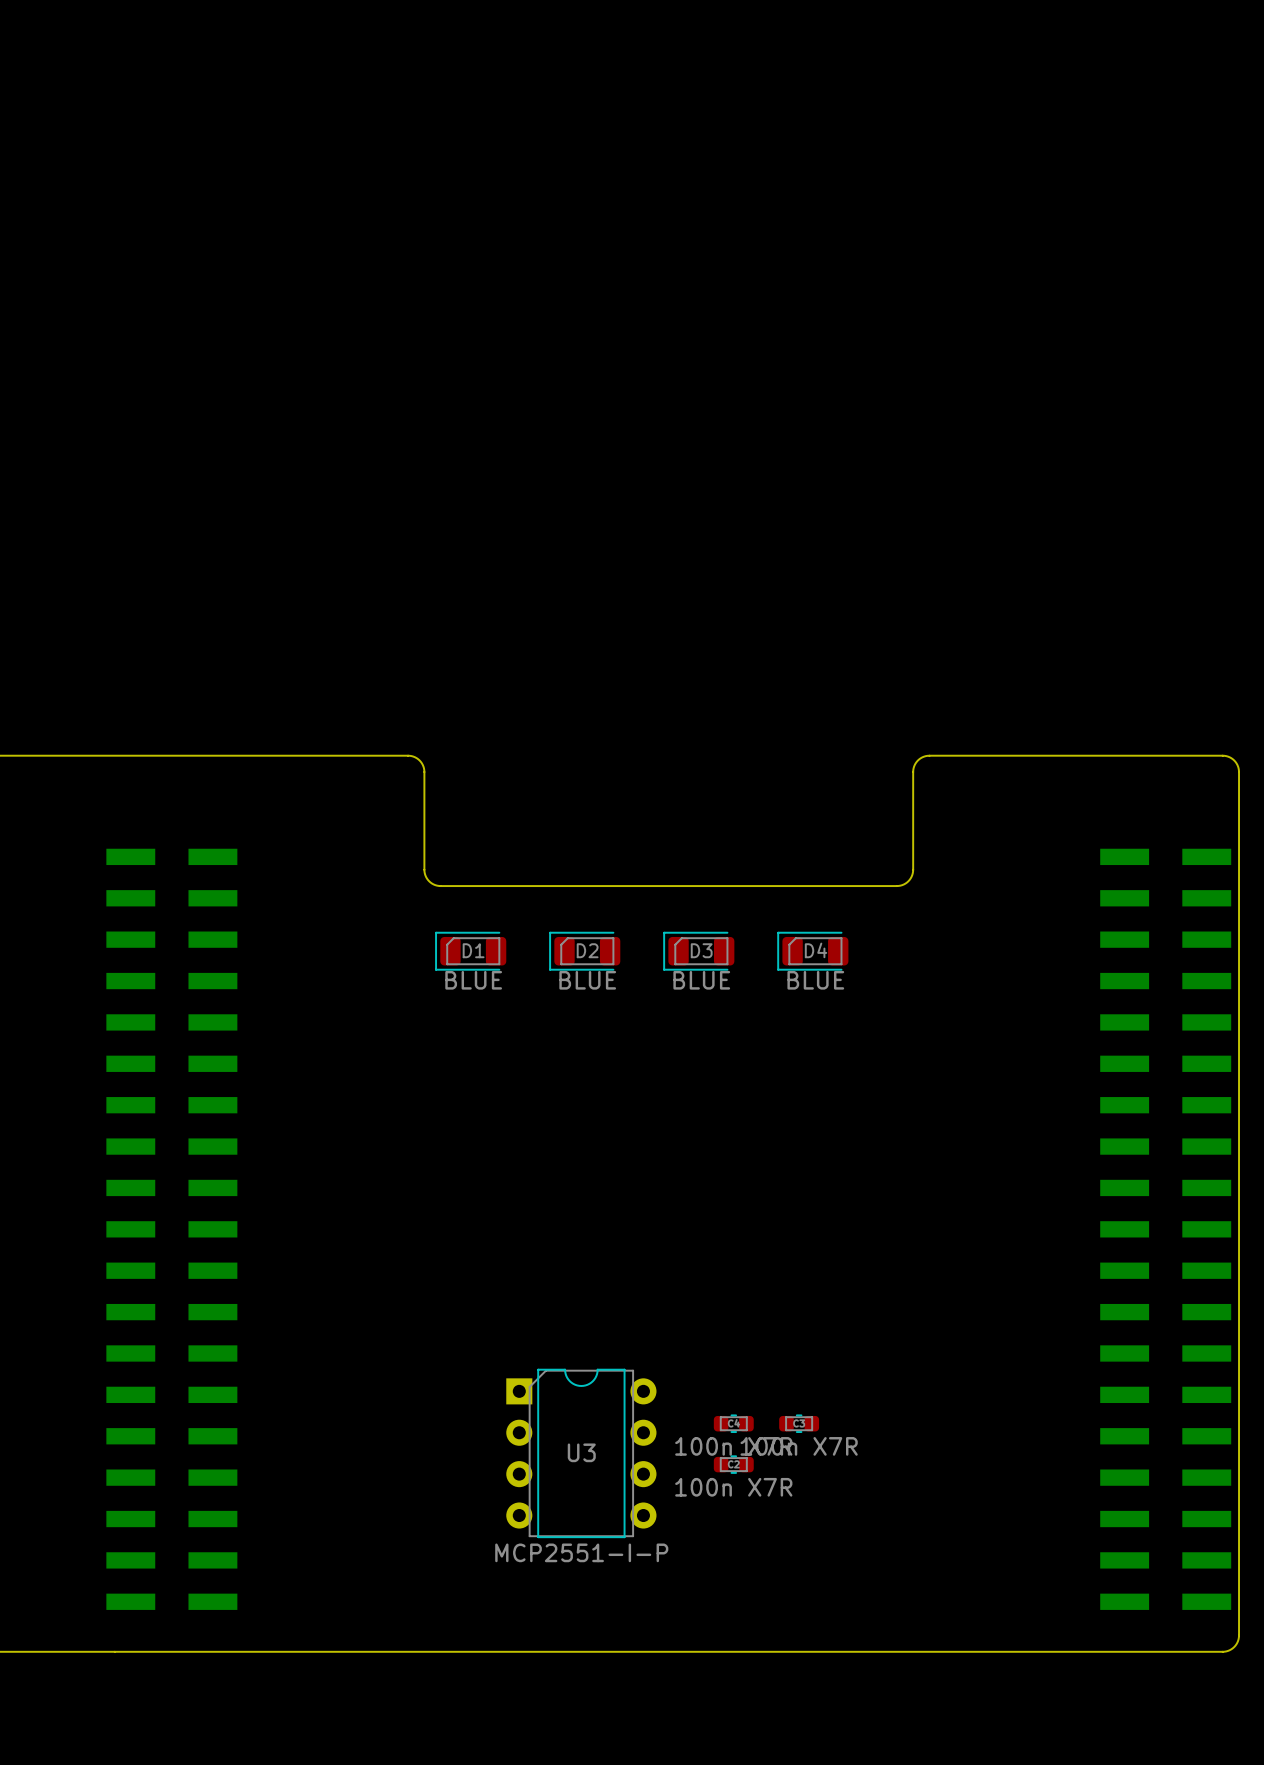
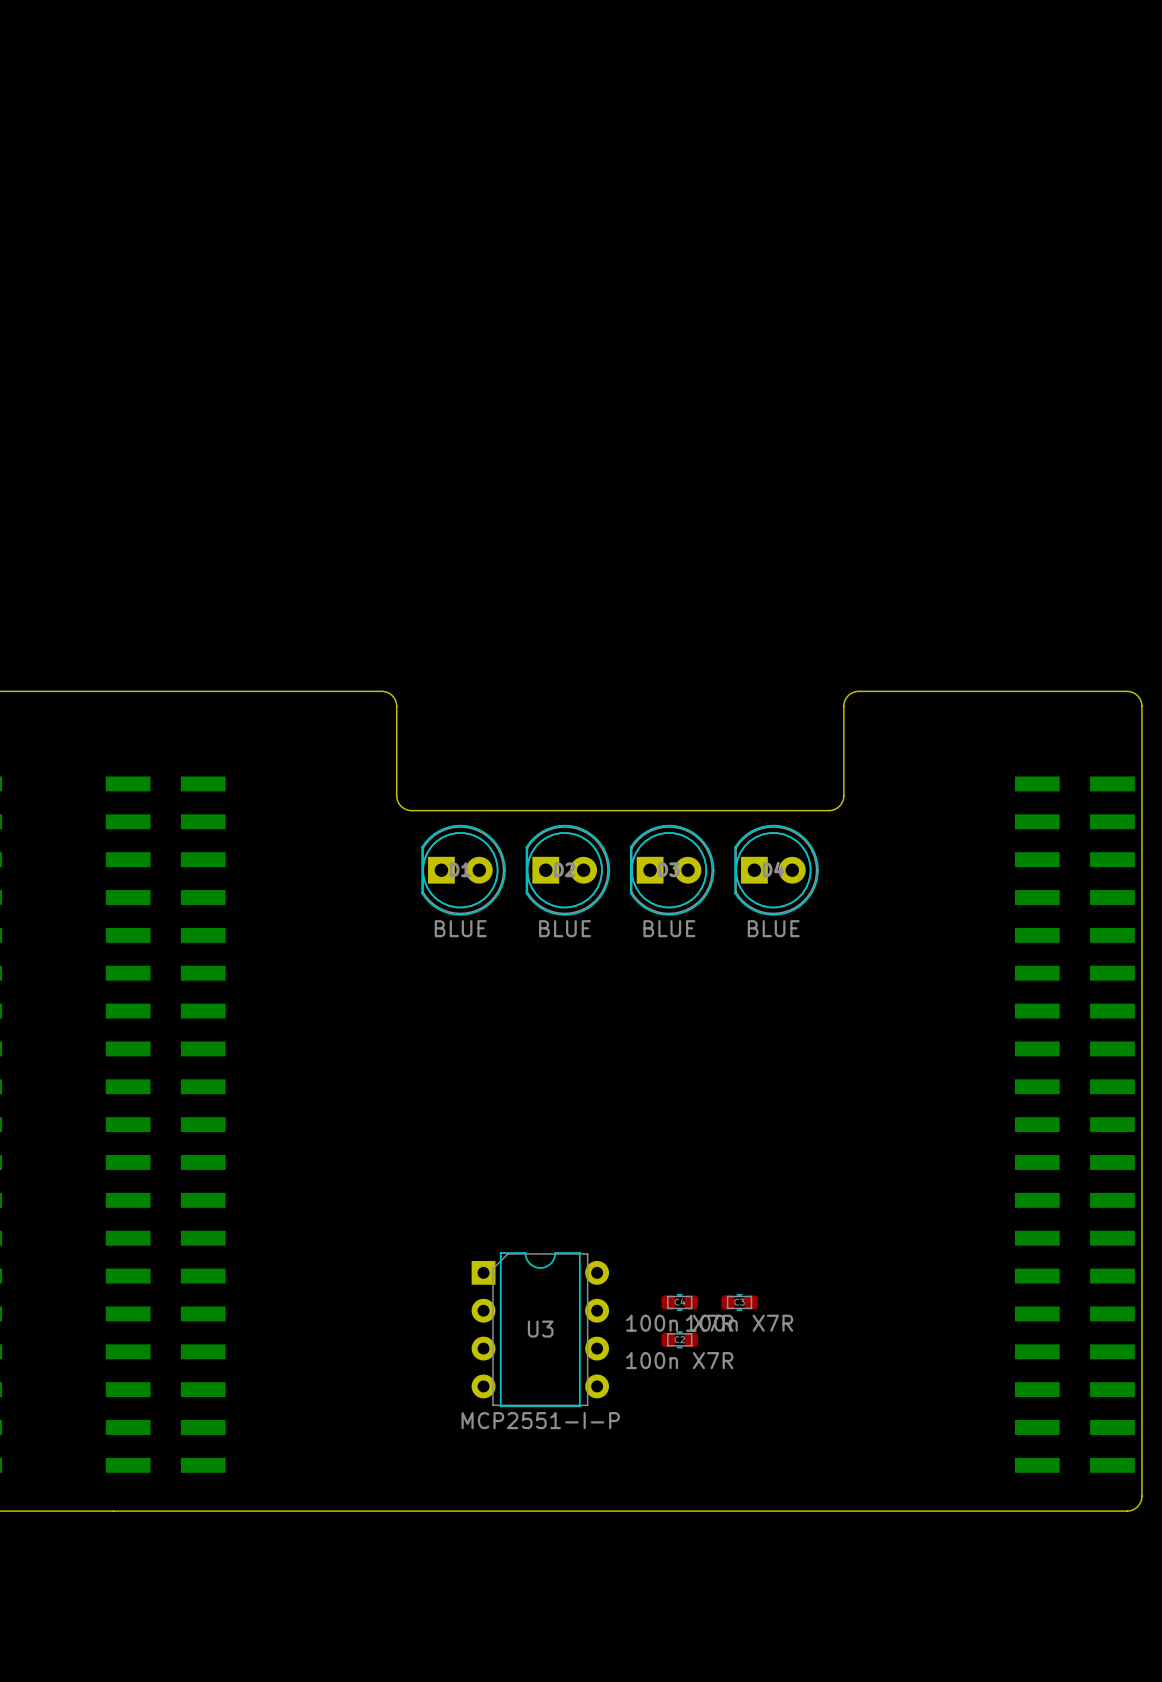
D1 footprint: [435, 931, 507, 971] -> [421, 824, 506, 916]
D2 footprint: [549, 931, 621, 971] -> [525, 824, 611, 916]
D3 footprint: [663, 931, 735, 971] -> [629, 824, 715, 916]
D4 footprint: [777, 931, 849, 971] -> [734, 824, 819, 916]
D1 value position: BLUE (473, 980) -> BLUE (460, 928)
D2 value position: BLUE (587, 980) -> BLUE (565, 928)
D3 value position: BLUE (701, 980) -> BLUE (669, 928)
D4 value position: BLUE (815, 980) -> BLUE (773, 928)

